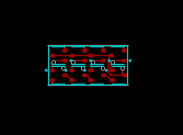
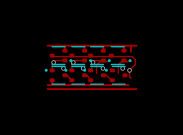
line: (48, 45) (127, 45) (127, 85) (48, 85) (48, 45) -> none
track: none -> (128, 45) (136, 45)
track: none -> (131, 45) (130, 51)
track: (52, 55) (111, 55) (108, 58) (108, 72) (111, 75) (125, 75) -> none
track: none -> (53, 56) (132, 56) (135, 59) (135, 64) (129, 70) (130, 78)
track: (124, 60) (114, 60) (111, 63) (111, 70) -> none
track: none -> (109, 61) (99, 61) (96, 64) (96, 73)
track: none -> (130, 61) (121, 61) (118, 64) (118, 73)
via position: (112, 62) -> (129, 70)
track: (122, 68) (124, 75) -> none
track: none -> (47, 89) (136, 89)

